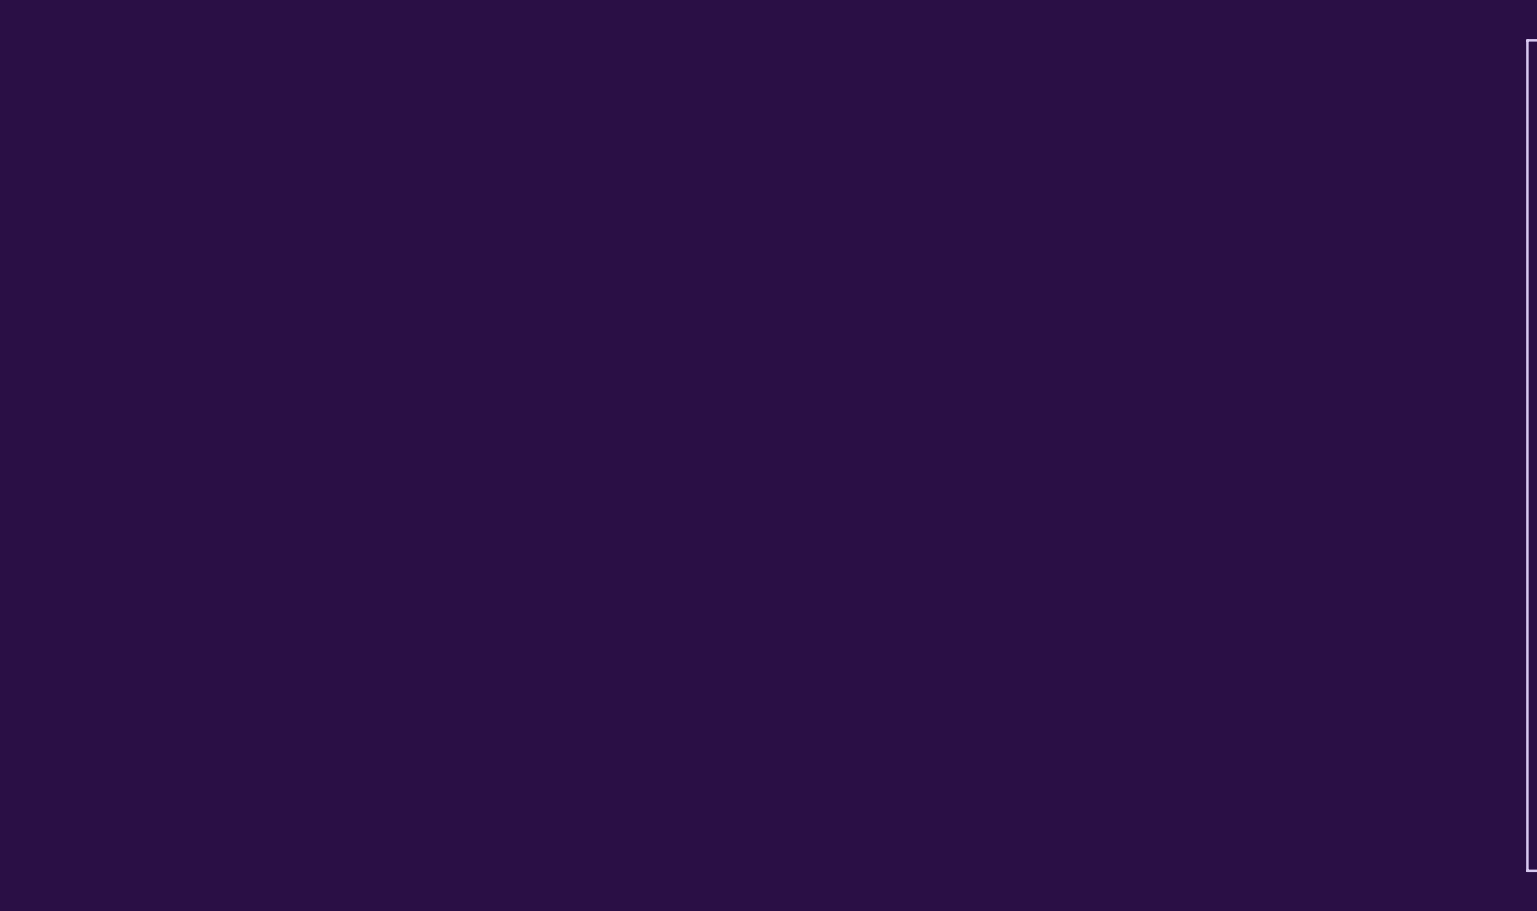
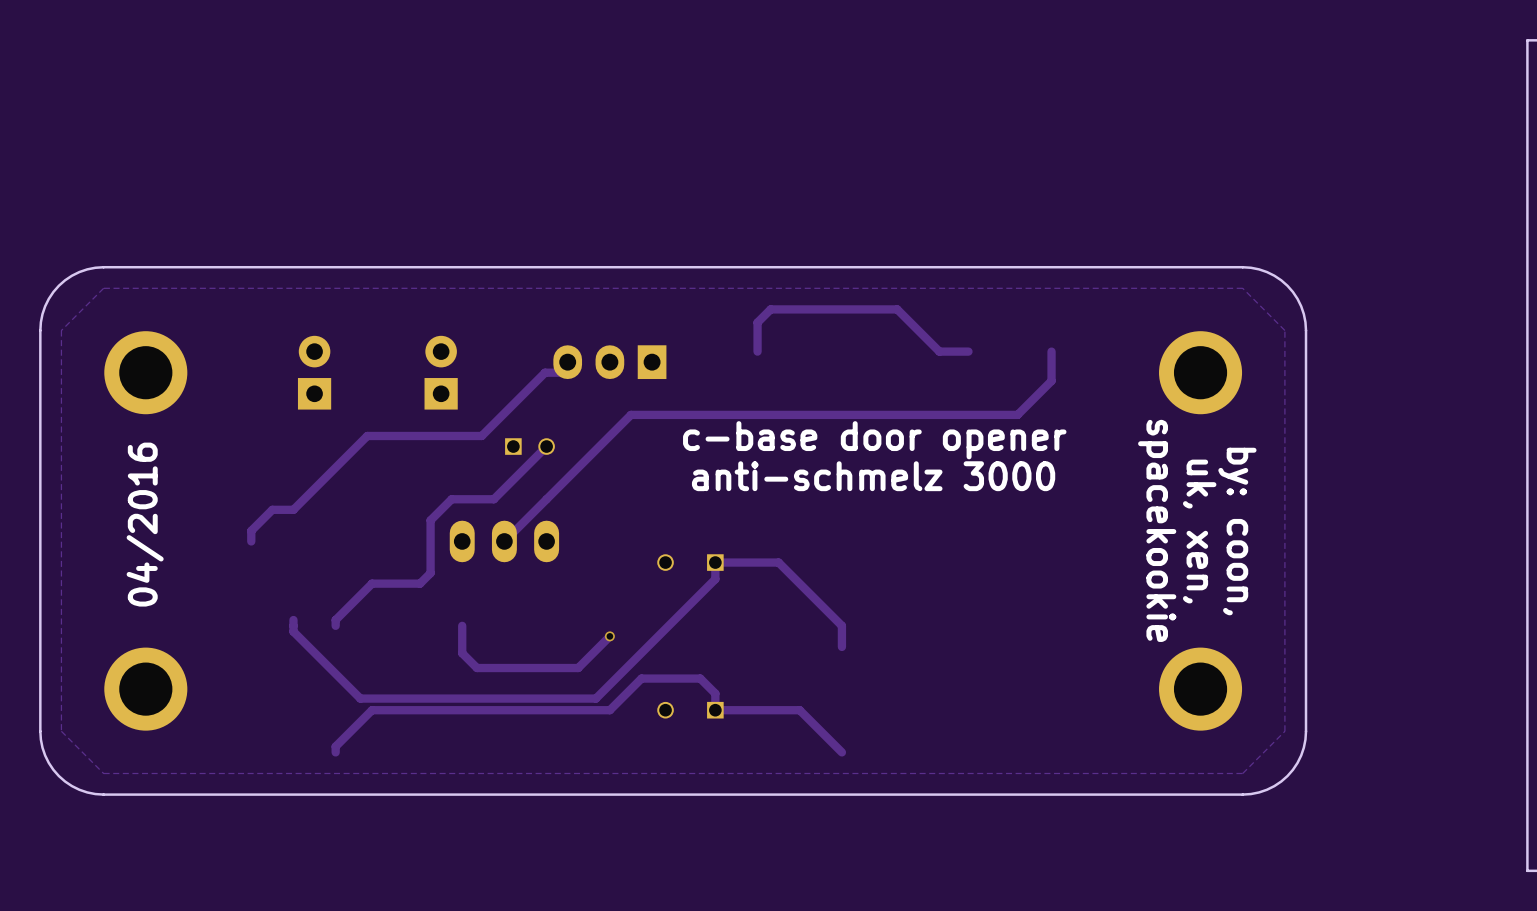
board edge: none -> (1242, 267) (103, 267) (79, 272) (65, 280) (53, 291) (45, 306) (40, 322) (40, 731) (45, 755) (58, 776) (71, 786) (87, 792) (103, 794) (1242, 794) (1266, 789) (1281, 781) (1292, 769) (1301, 755) (1305, 739) (1306, 330) (1301, 306) (1287, 285) (1266, 272) (1242, 267)
zone outline: none -> (1242, 288) (1284, 330) (1284, 731) (1242, 773) (103, 773) (61, 731) (61, 330) (103, 288) (1242, 288)
track: none -> (968, 351) (939, 351) (897, 309) (770, 309) (757, 322) (757, 351)
track: none -> (1051, 351) (1051, 380) (1017, 414) (630, 414) (504, 541) (504, 533)
part: none -> (609, 362)
part: none -> (145, 372)
part: none -> (314, 372)
part: none -> (441, 372)
track: none -> (567, 372) (545, 372) (481, 435) (367, 435) (293, 509) (272, 509) (251, 530) (251, 541)
part: none -> (1200, 372)
text: none -> c-base door opener (874, 440)
part: none -> (529, 446)
track: none -> (546, 446) (493, 499) (451, 499) (430, 520) (430, 573) (420, 583) (372, 583) (335, 620) (335, 625)
text: none -> anti-schmelz 3000 (873, 476)
text: none -> 04/2016 (145, 524)
text: none -> spacekookie (1157, 530)
text: none -> uk, xen, (1199, 531)
text: none -> by: coon, (1237, 531)
part: none -> (504, 541)
part: none -> (690, 562)
track: none -> (293, 620) (293, 631) (360, 698) (595, 698) (715, 579) (715, 562) (778, 562) (841, 625) (841, 646)
track: none -> (462, 625) (462, 653) (477, 668) (578, 668) (609, 636)
via: none -> (609, 636)
part: none -> (145, 689)
part: none -> (1200, 689)
part: none -> (690, 710)
track: none -> (841, 752) (799, 710) (715, 710) (715, 693) (700, 678) (641, 678) (609, 710) (372, 710) (335, 746) (335, 752)

